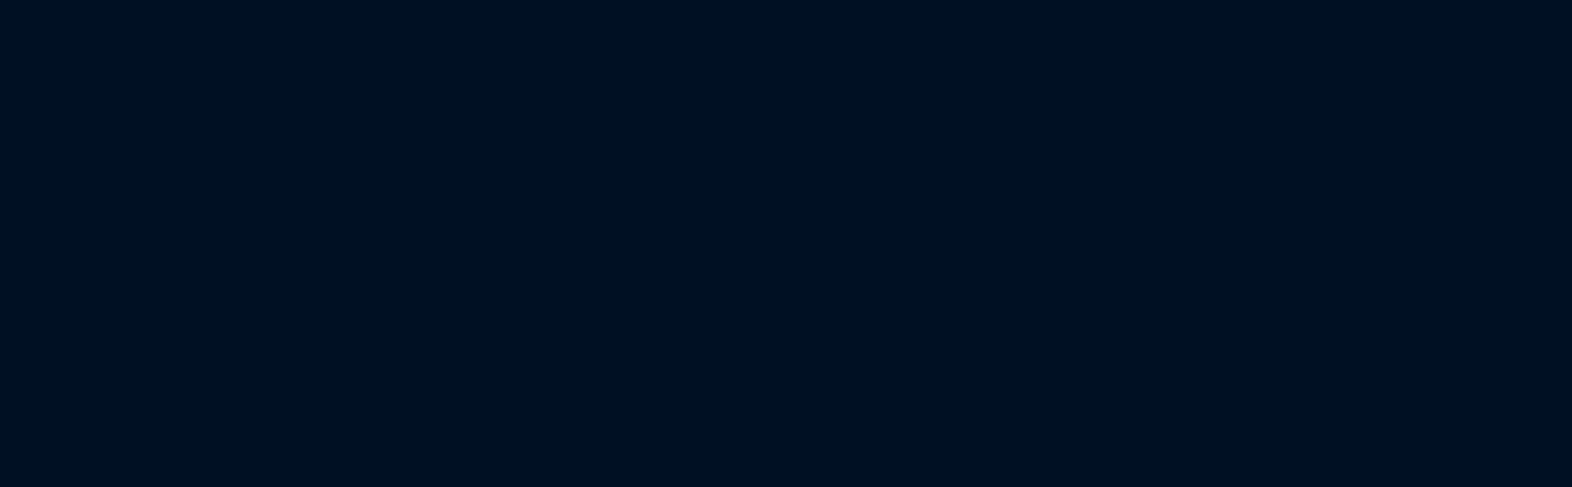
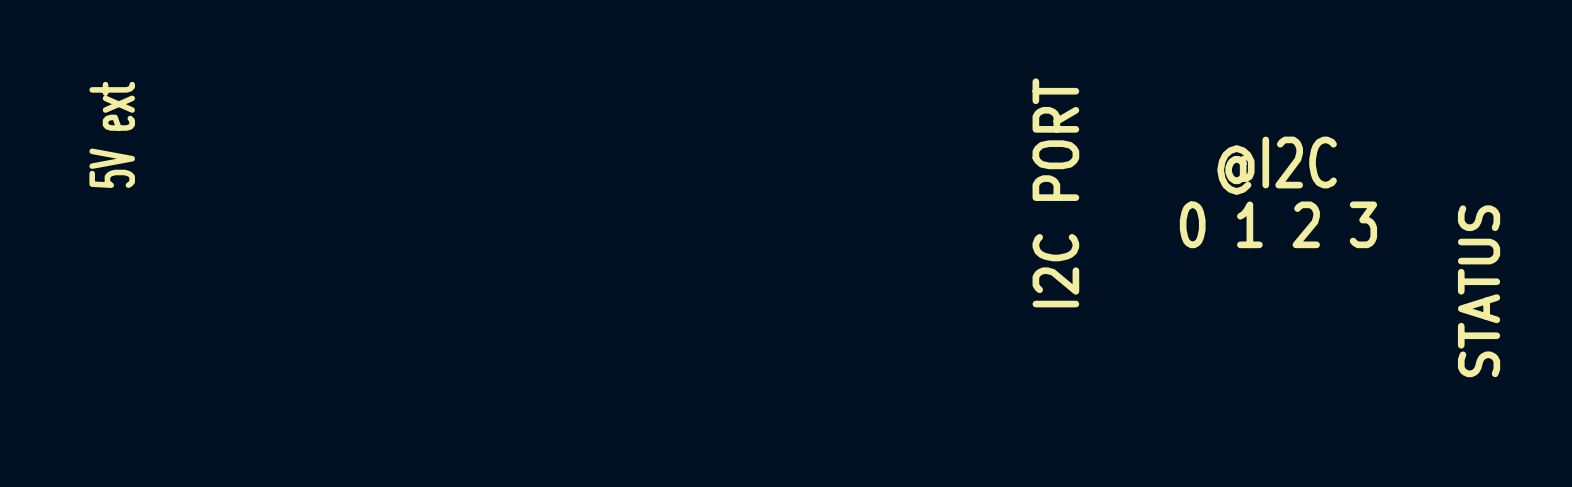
text: none -> 5V ext (112, 134)
text: none -> @I2C (1277, 165)
text: none -> I2C PORT (1055, 192)
text: none -> 0 1 2 3 (1278, 224)
text: none -> STATUS (1479, 291)

